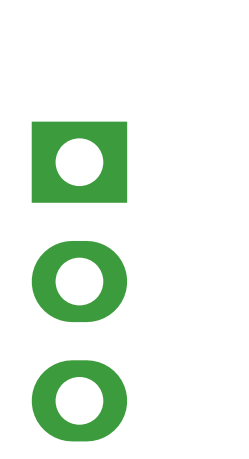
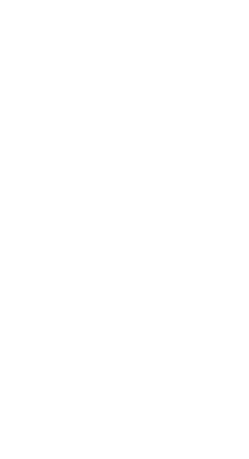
part: (79, 281) -> none

